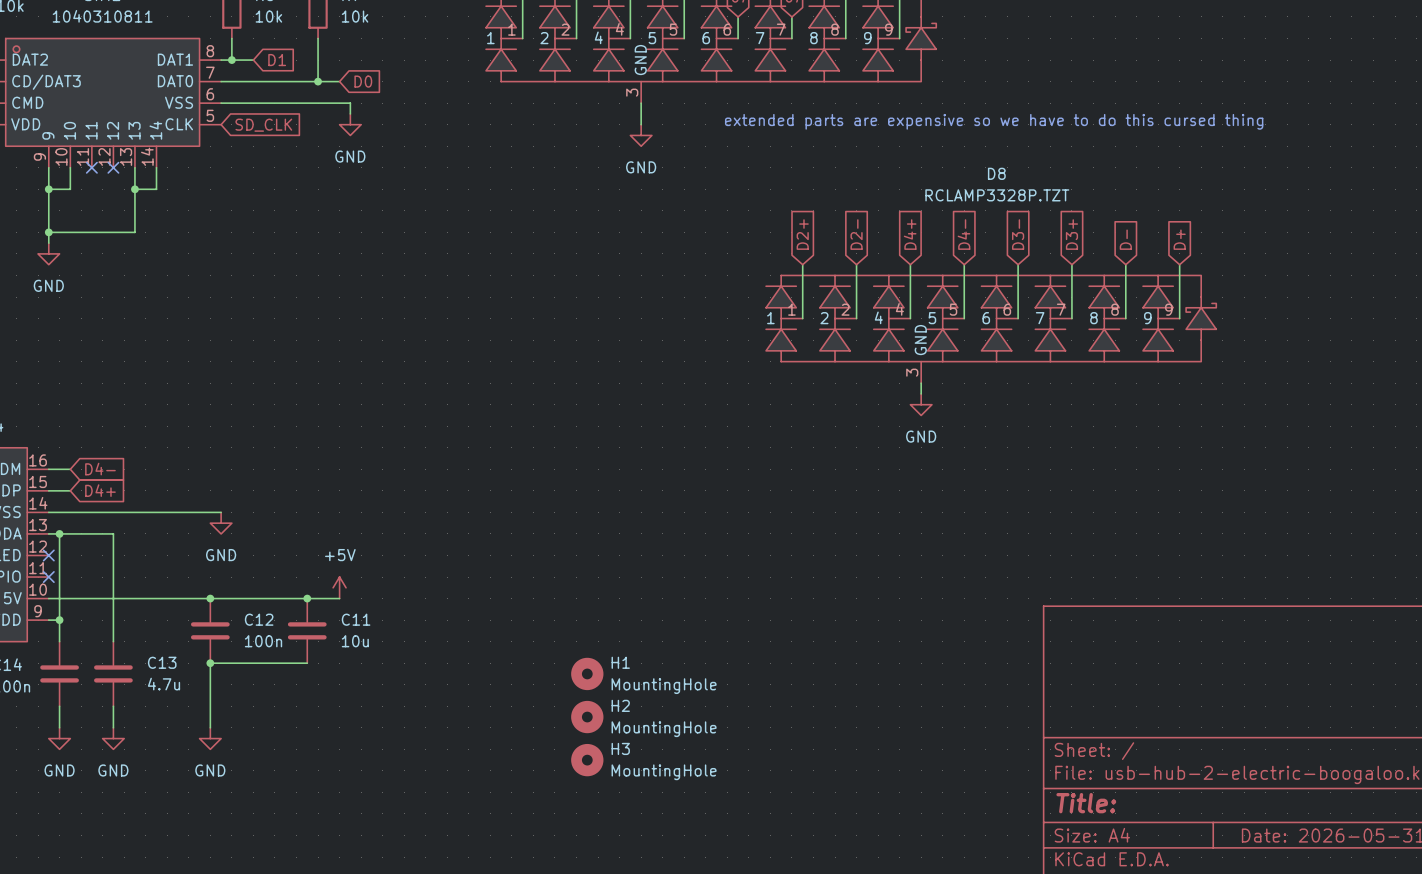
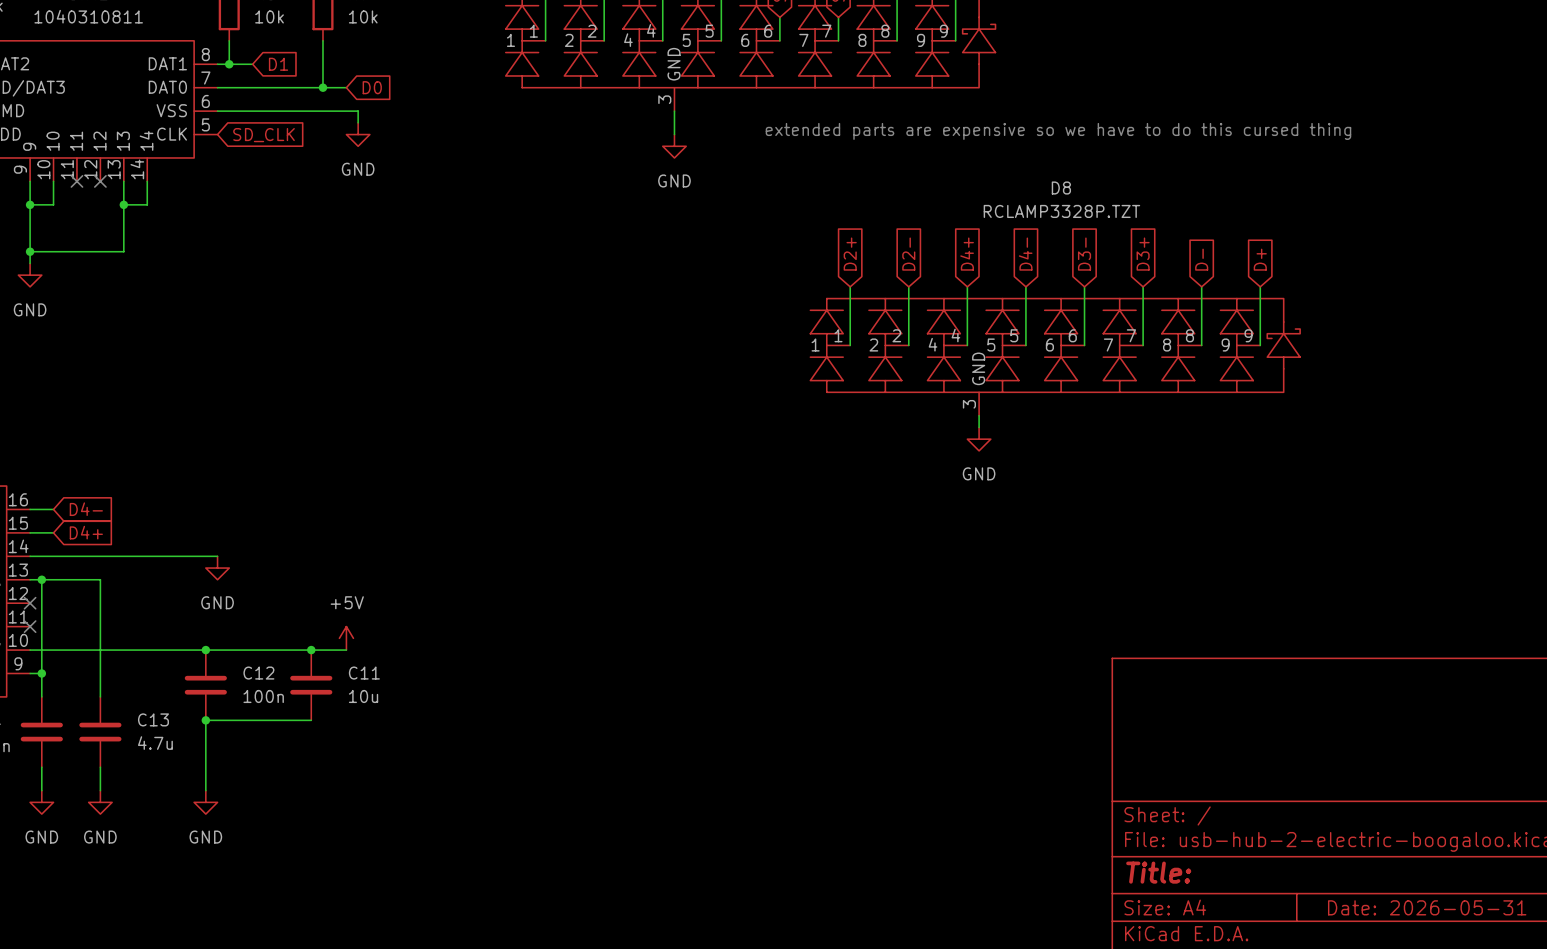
H1: MountingHole (587, 673) -> none
H2: MountingHole (587, 717) -> none
H3: MountingHole (587, 760) -> none

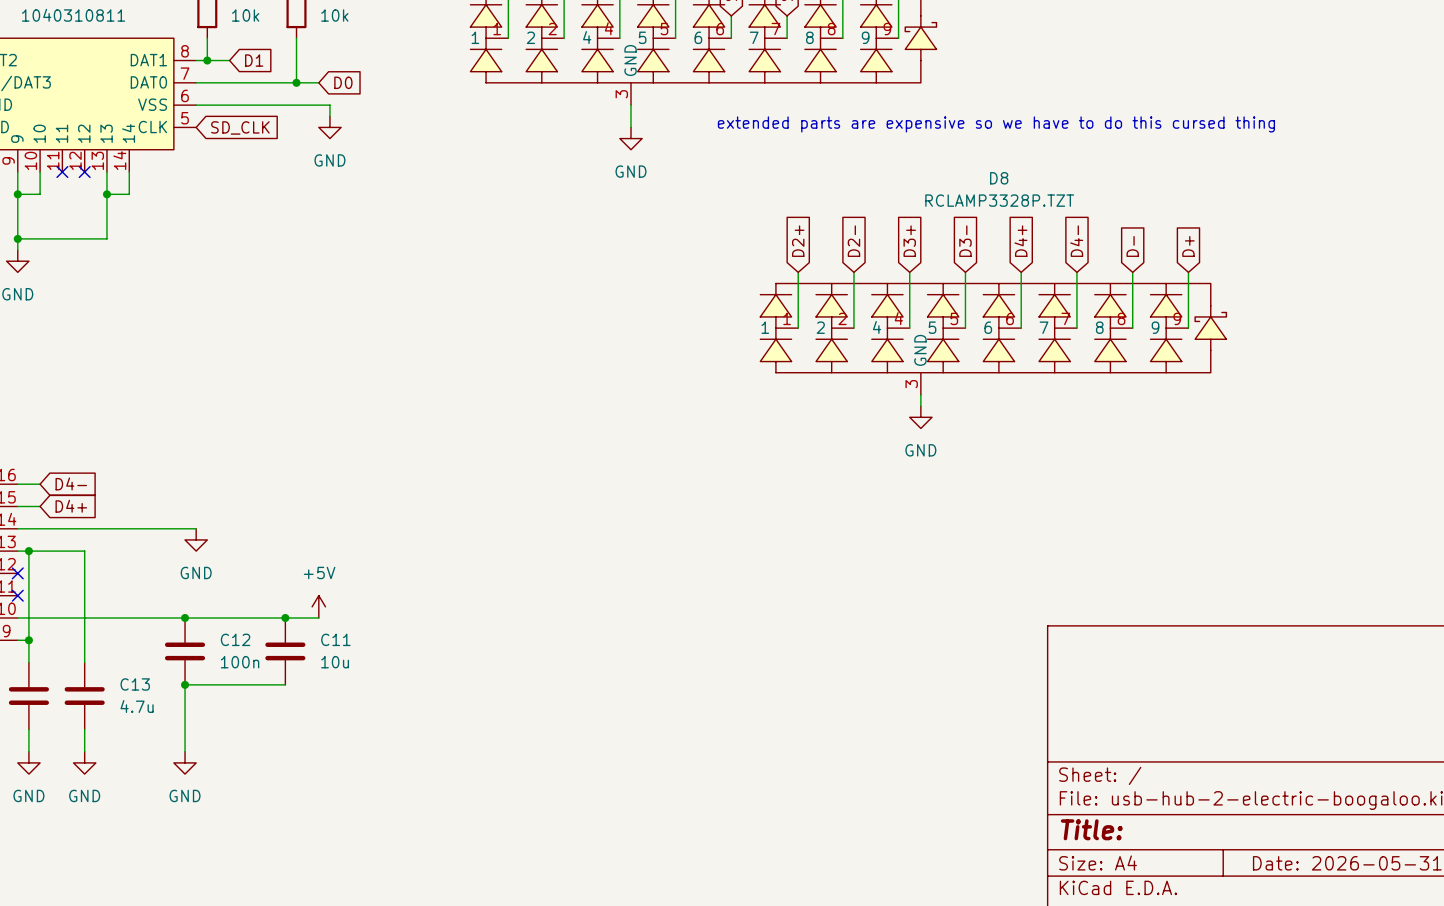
global label: D4+ (967, 254) -> D3+ (909, 241)
global label: D4- (1025, 254) -> D3- (965, 241)
global label: D3- (1084, 254) -> D4+ (1020, 241)
global label: D3+ (1143, 254) -> D4- (1076, 241)

